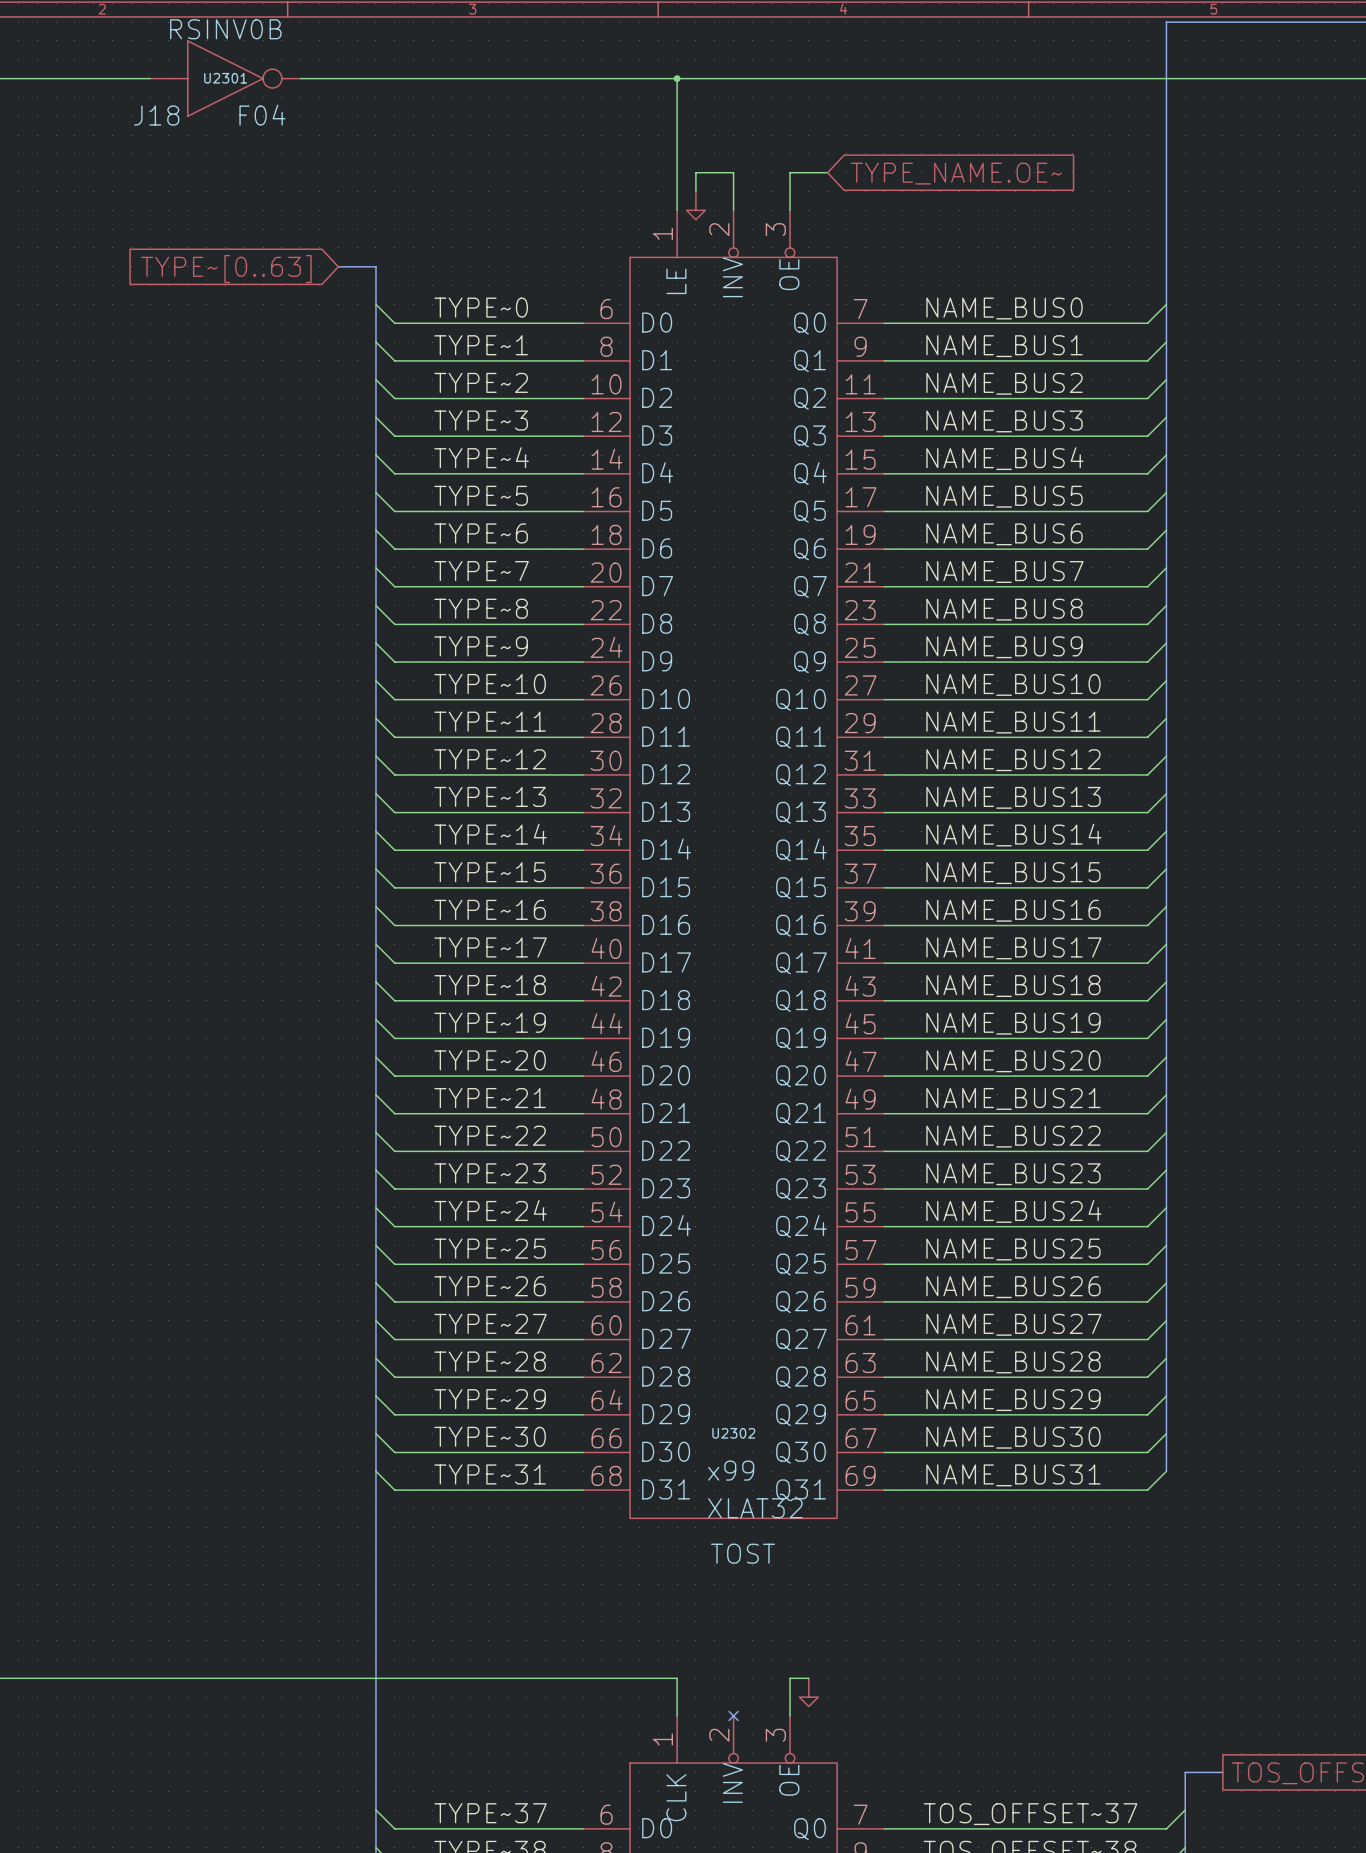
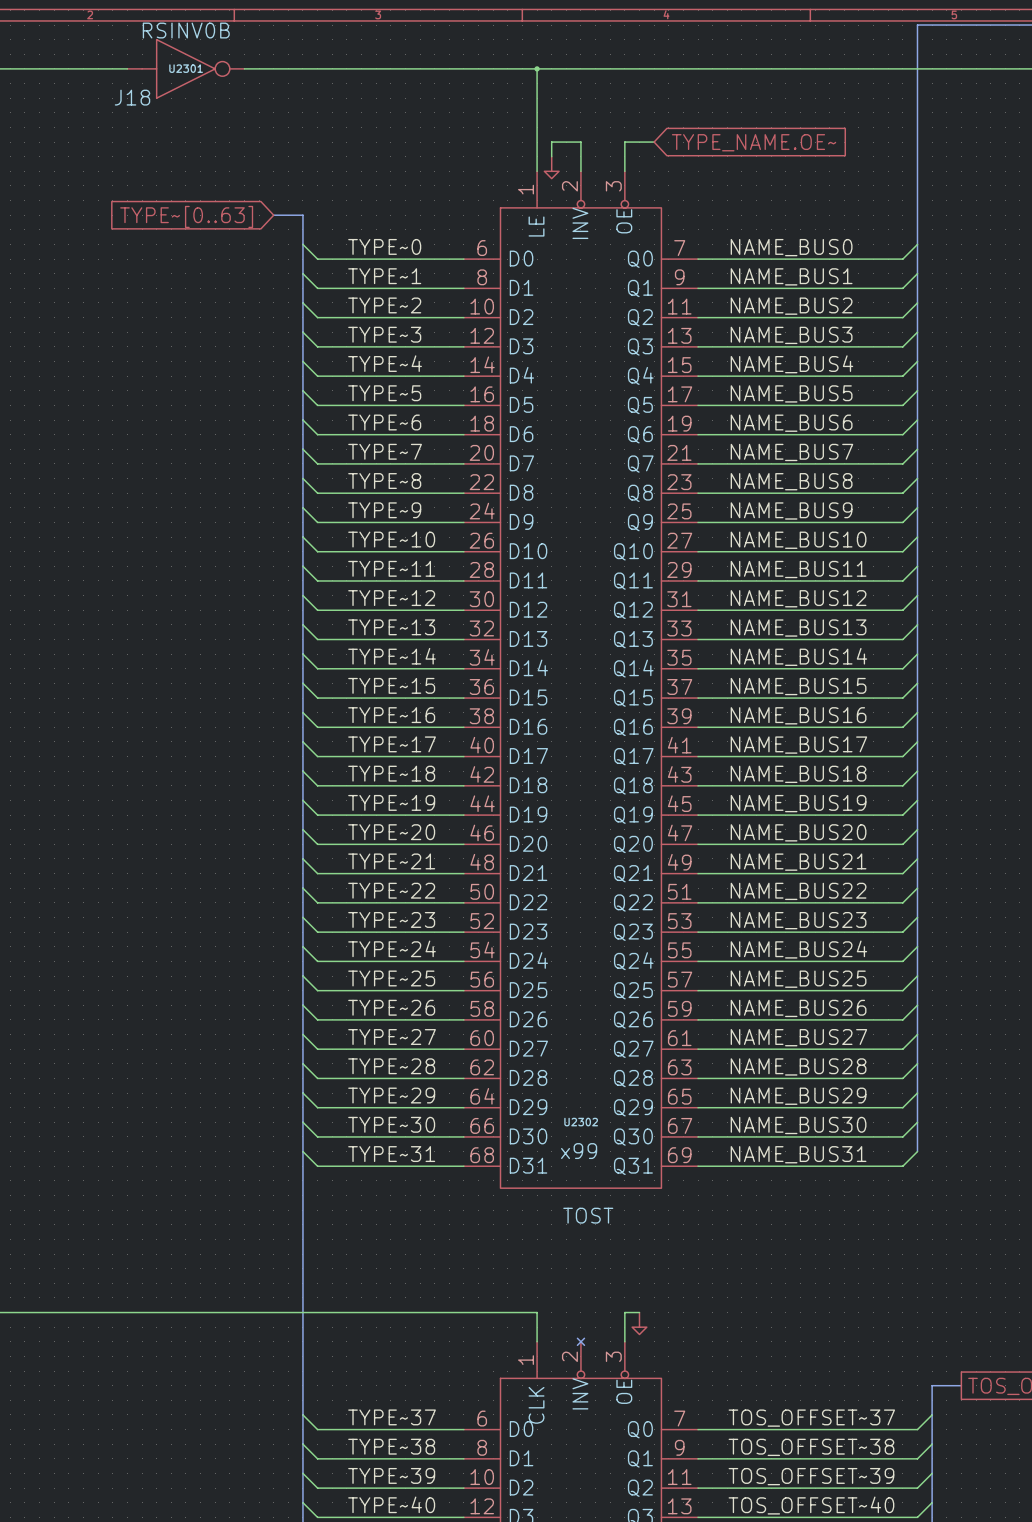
U2301 value: F04 (262, 115) -> none
U2302 value: XLAT32 (755, 1508) -> none

